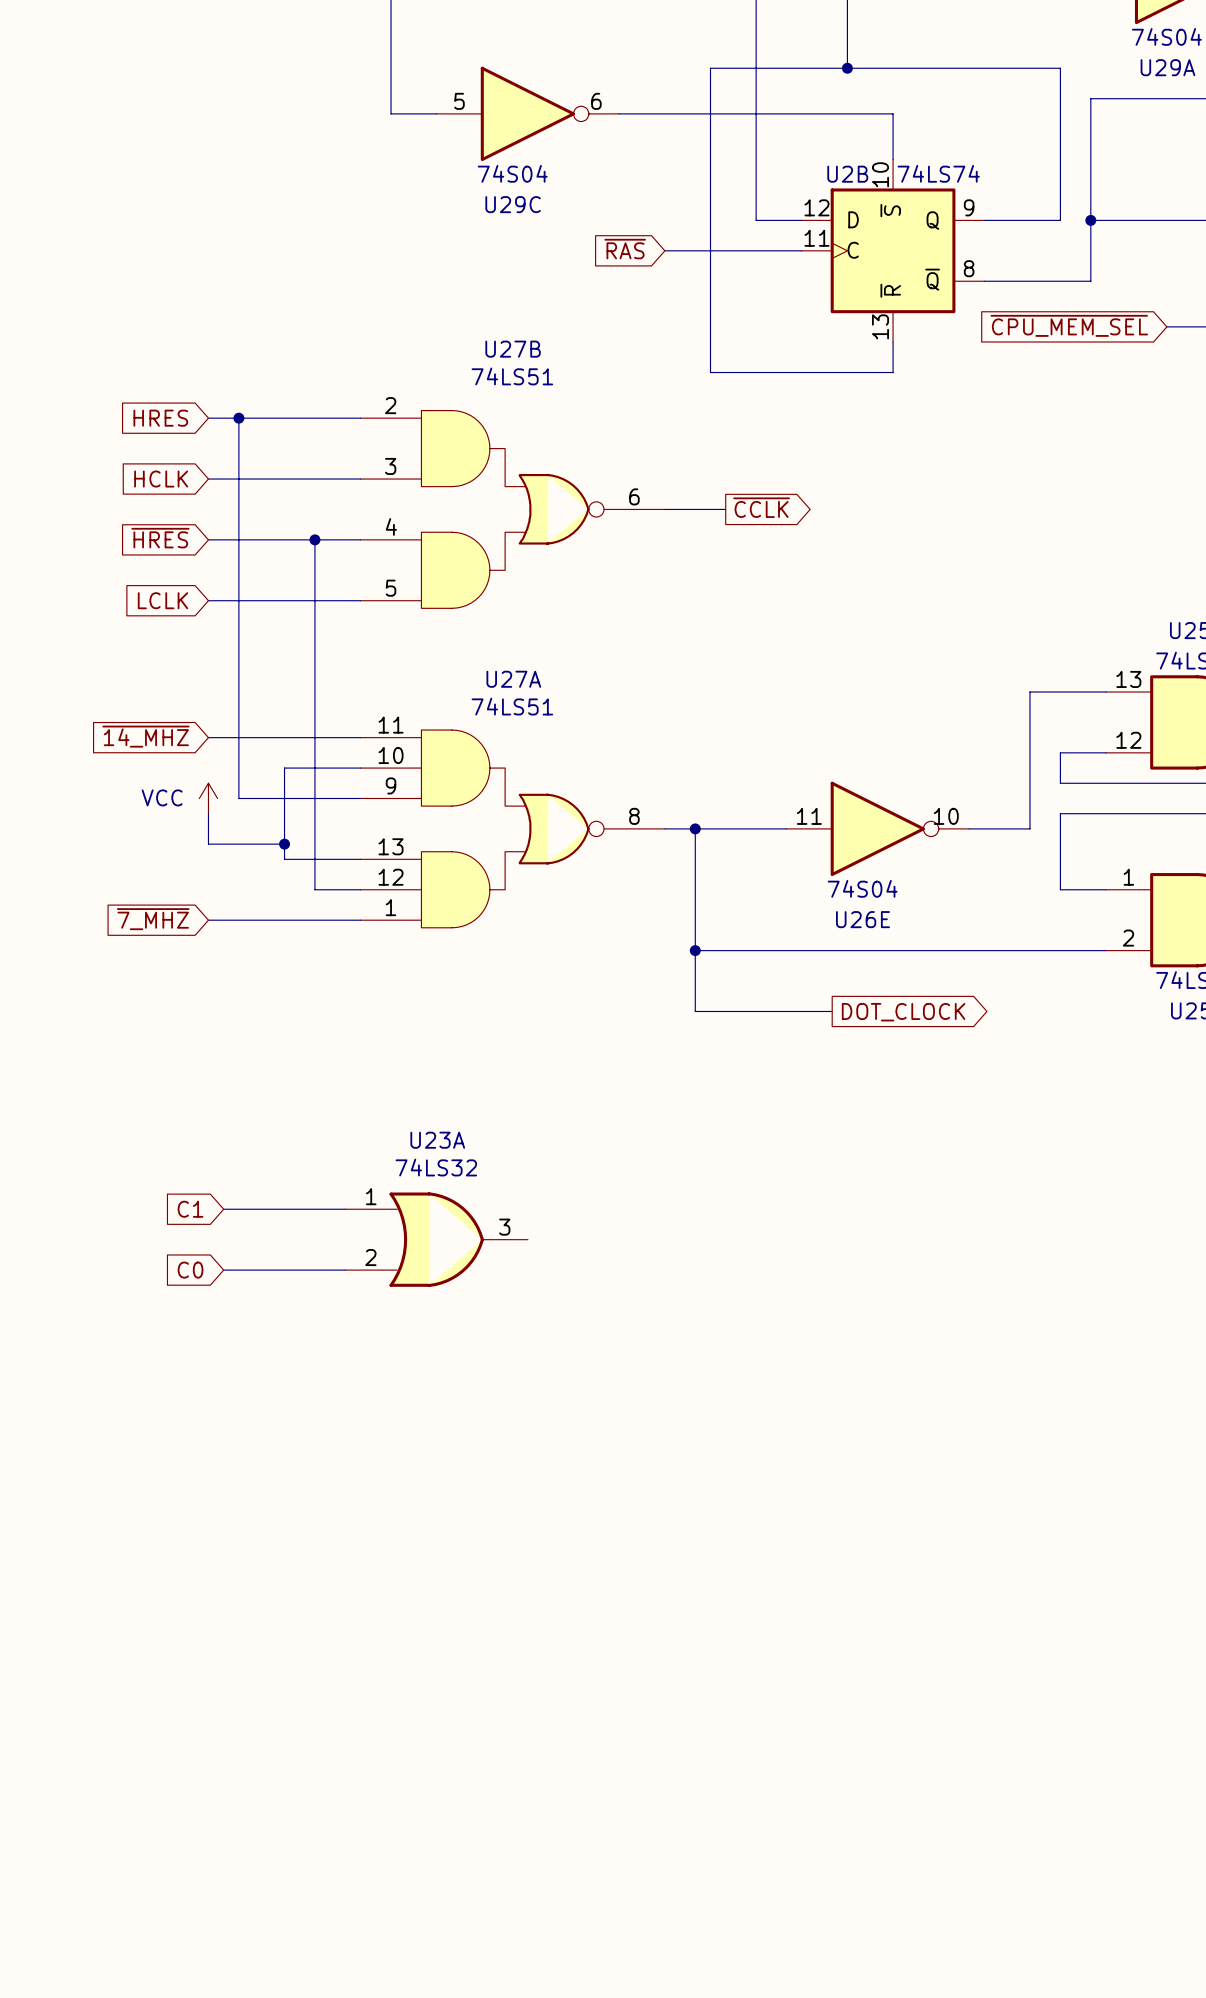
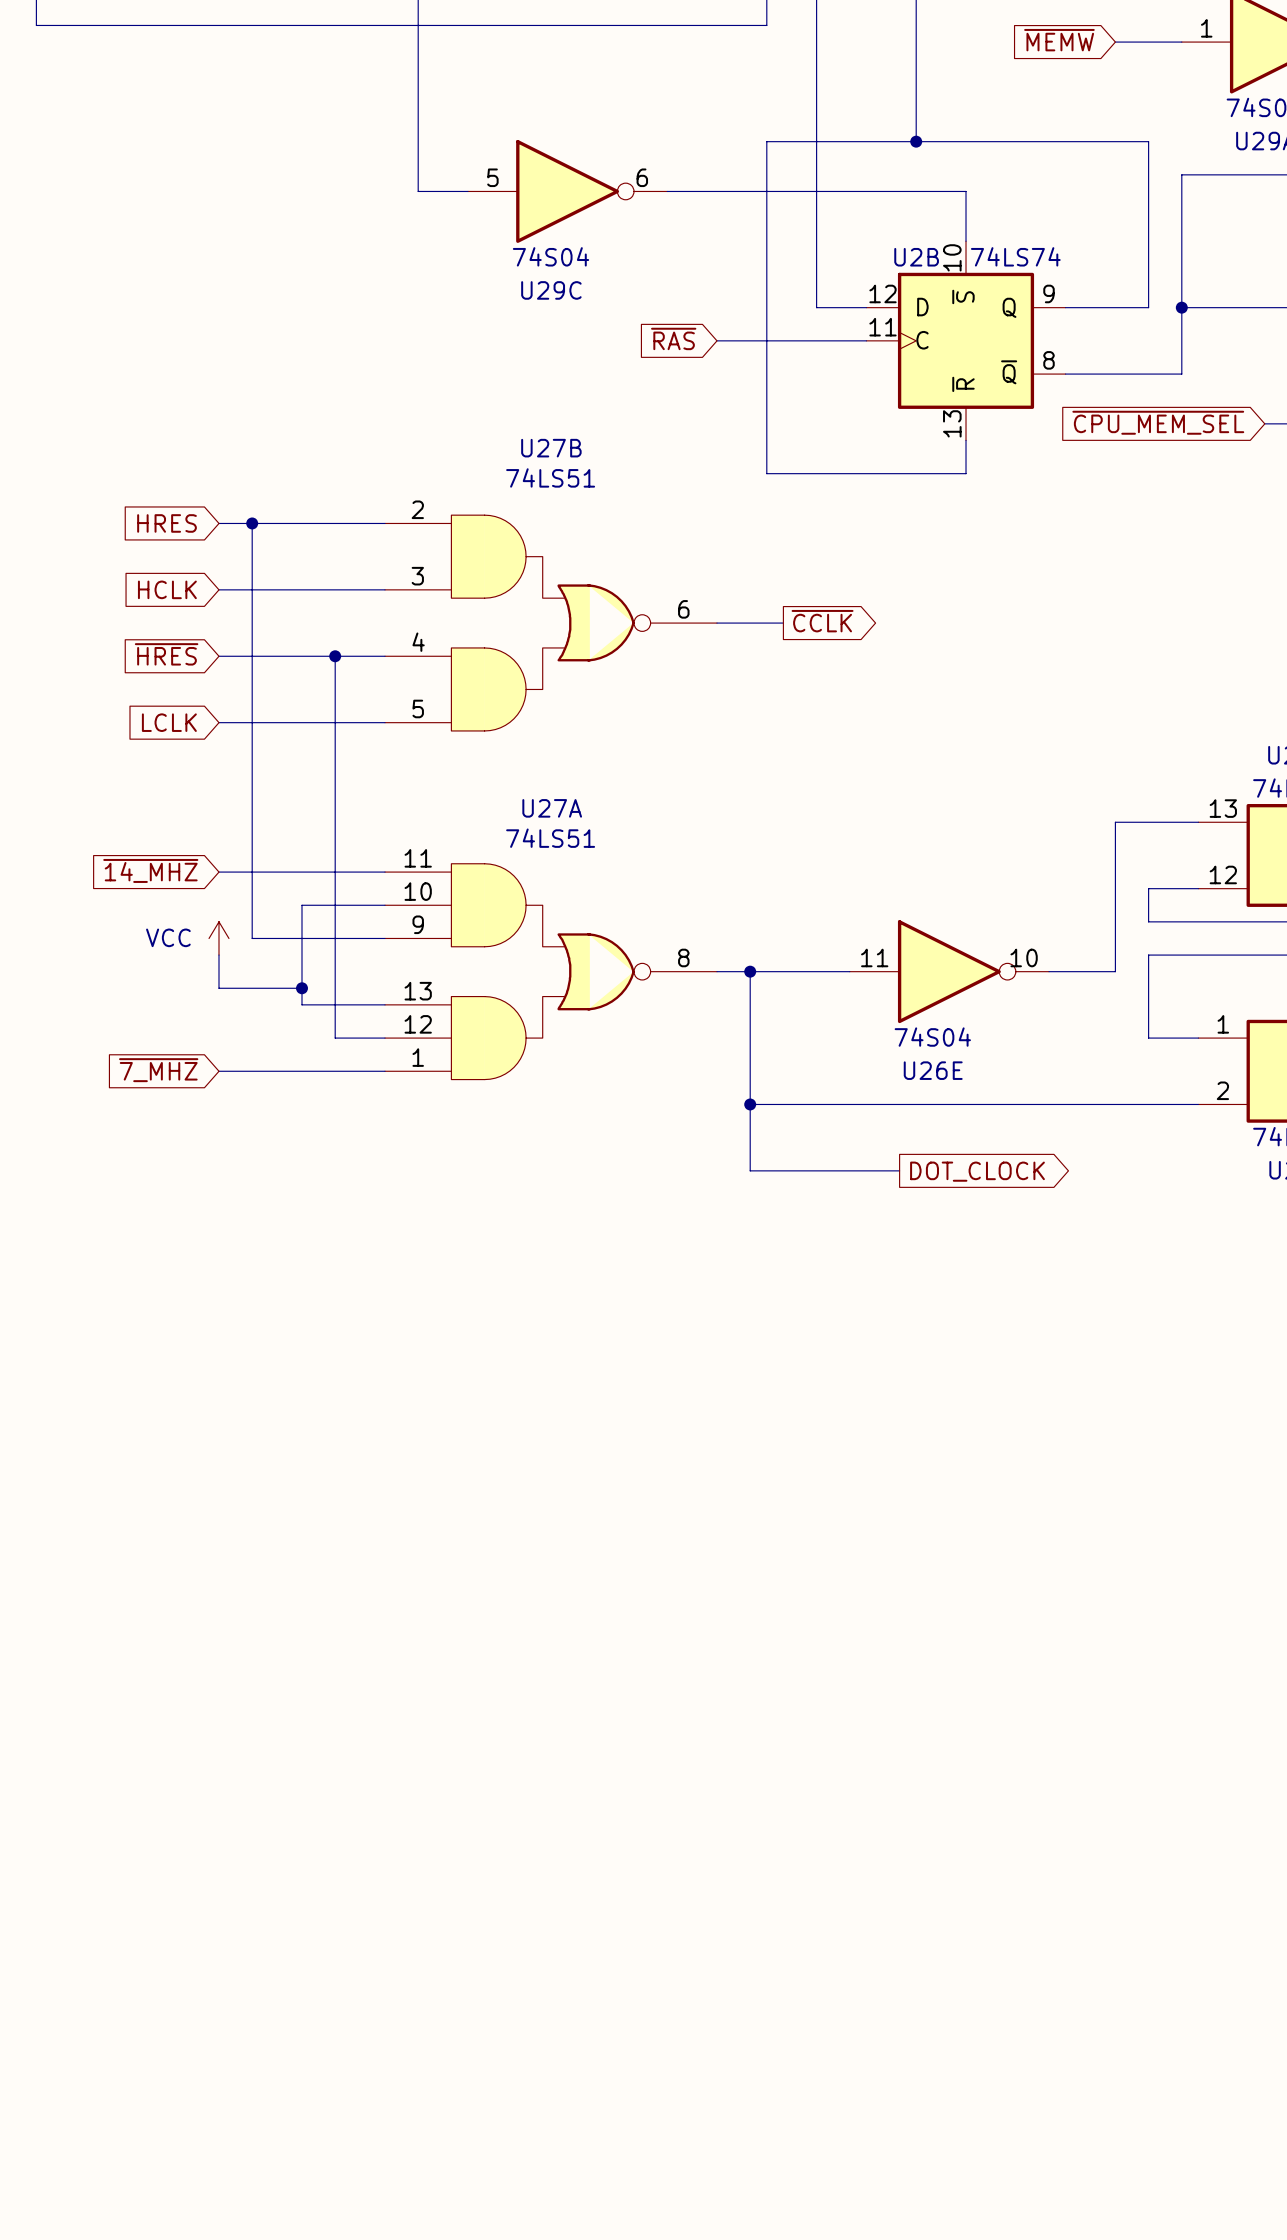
global label: C1 (190, 1209) -> none
wire: (223, 1209) (345, 1209) -> none
U23A: 74LS32 (436, 1239) -> none
global label: C0 (190, 1270) -> none
wire: (223, 1270) (345, 1270) -> none

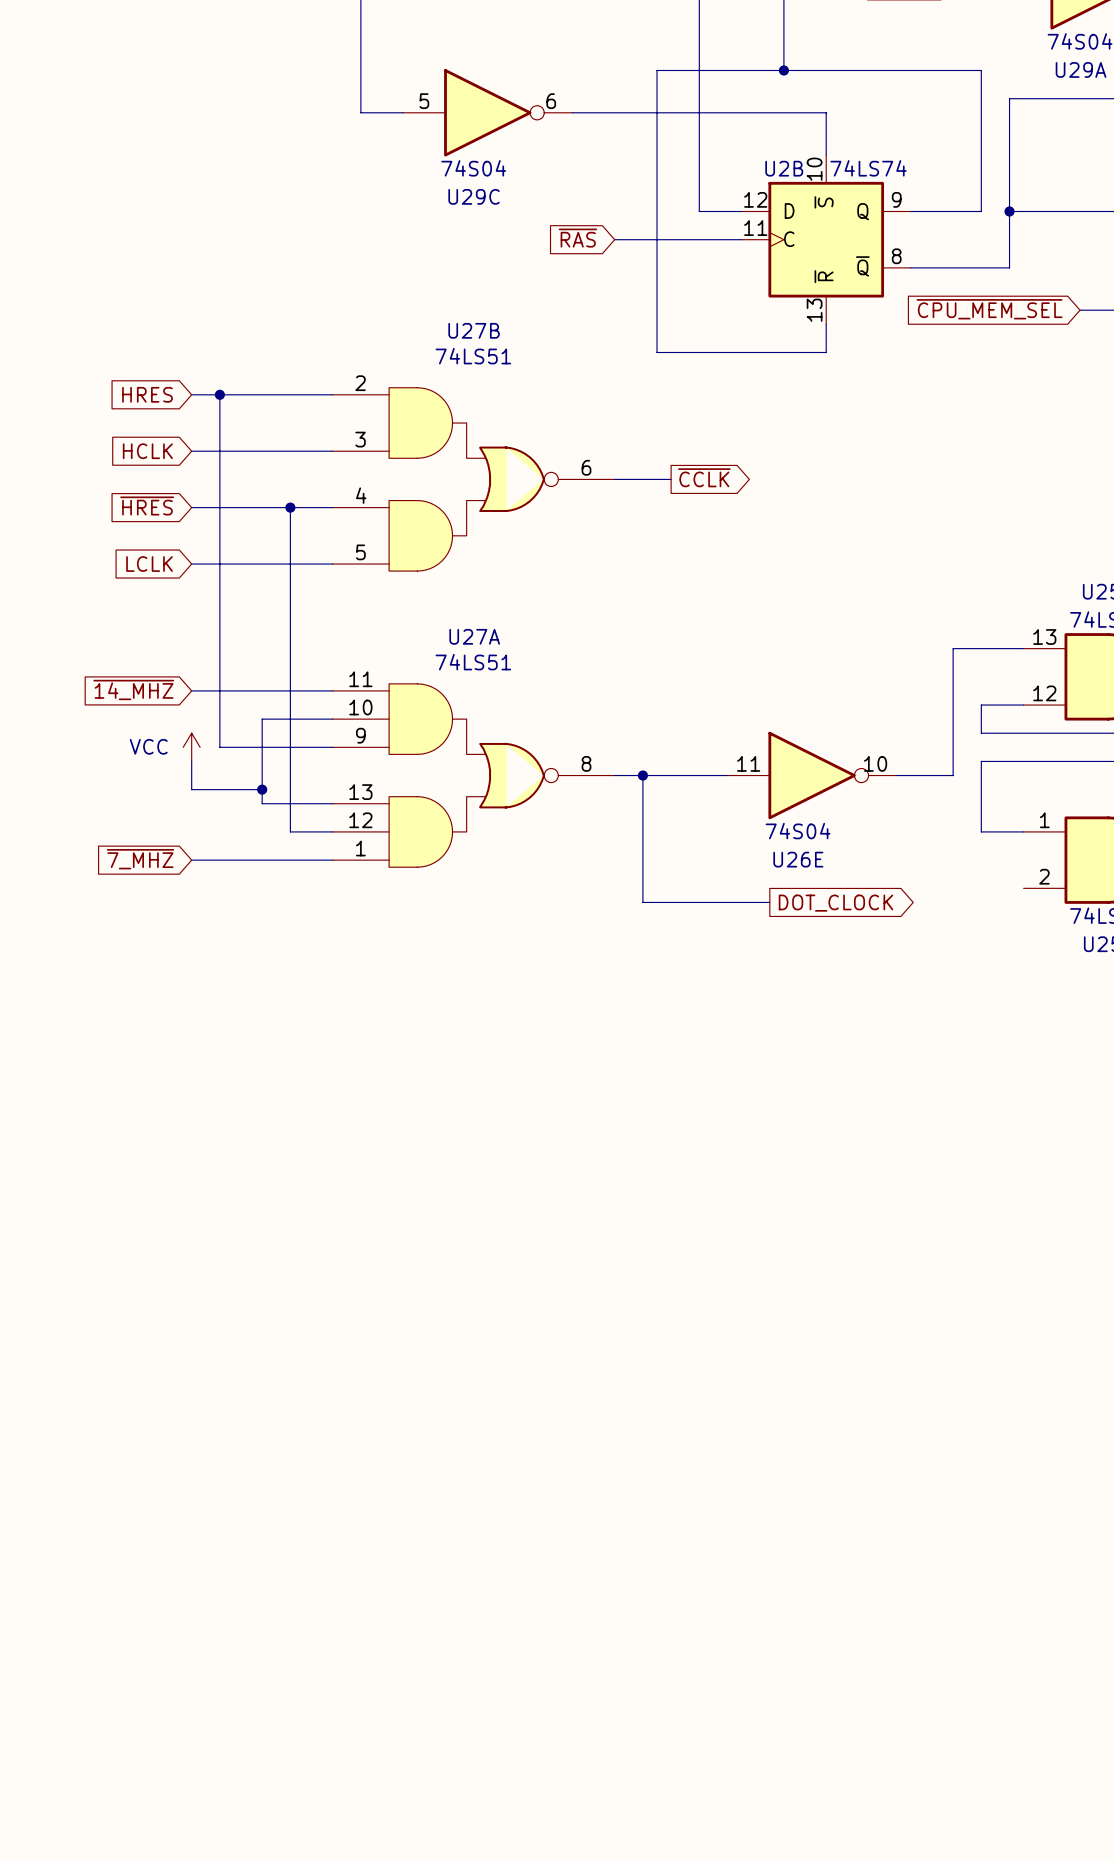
wire: (750, 1104) (1198, 1104) -> none
junction: (750, 1104) -> none
wire: (750, 1121) (750, 1170) (899, 1170) -> (642, 902) (769, 902)
global label position: DOT_CLOCK (977, 1171) -> DOT_CLOCK (835, 903)

